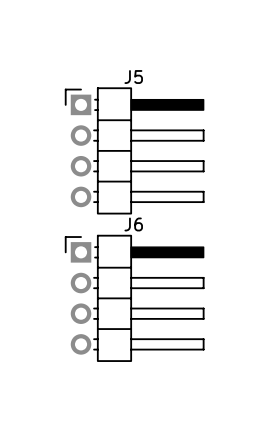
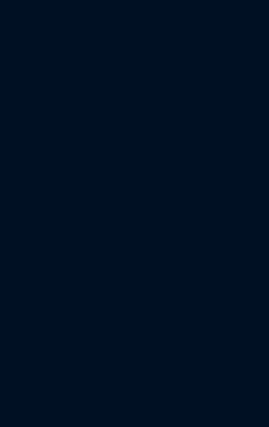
J5: (134, 150) -> none
J6: (134, 298) -> none

